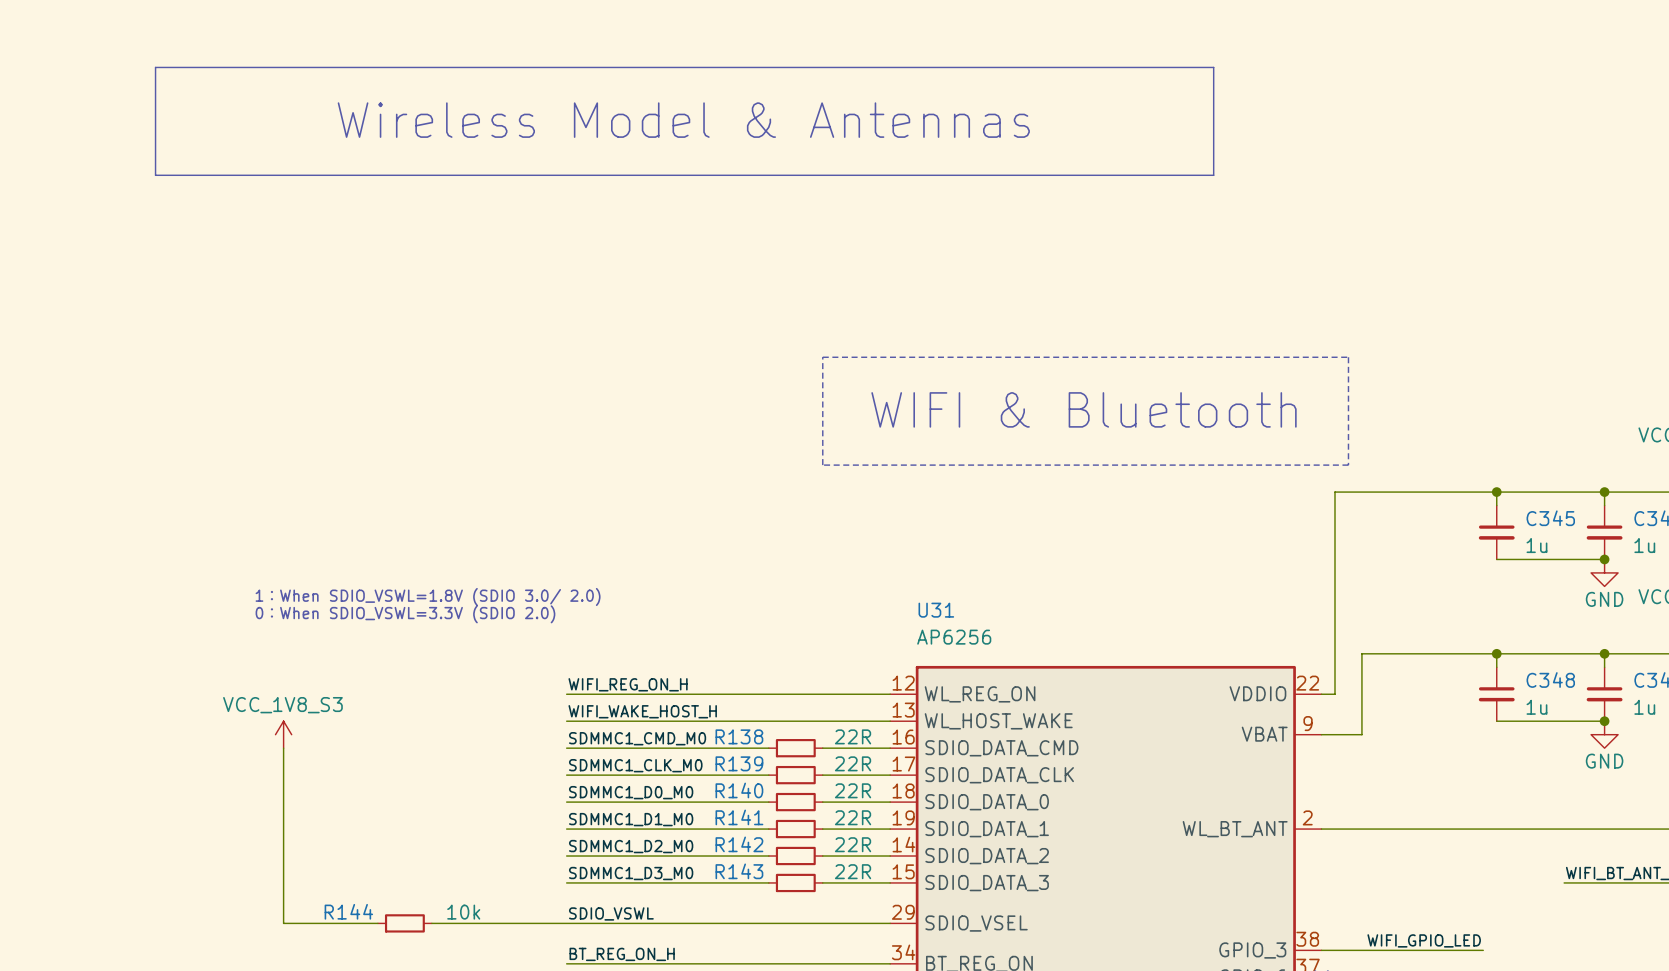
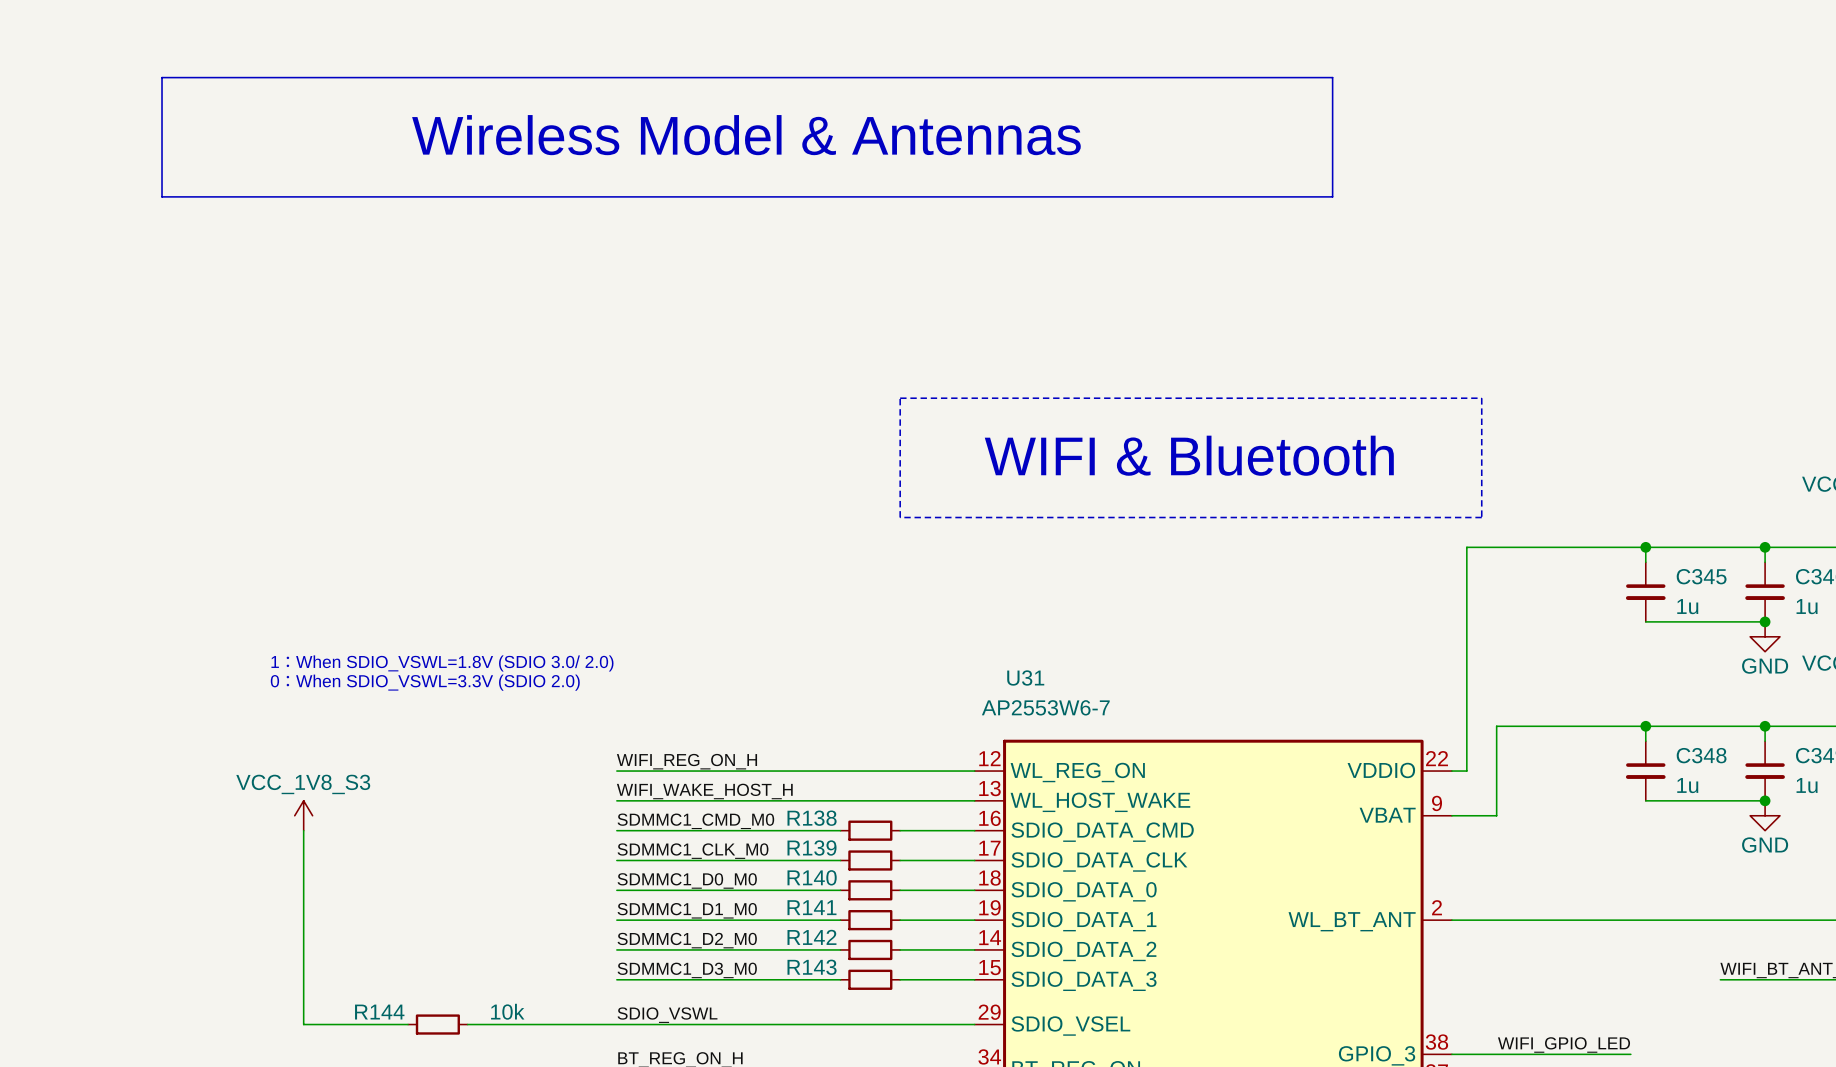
U31 value: AP6256 (954, 637) -> AP2553W6-7 (1045, 707)
R138 value: 22R (853, 736) -> none
R139 value: 22R (853, 763) -> none
R140 value: 22R (853, 790) -> none
R141 value: 22R (853, 817) -> none
R142 value: 22R (853, 844) -> none
R143 value: 22R (853, 871) -> none

